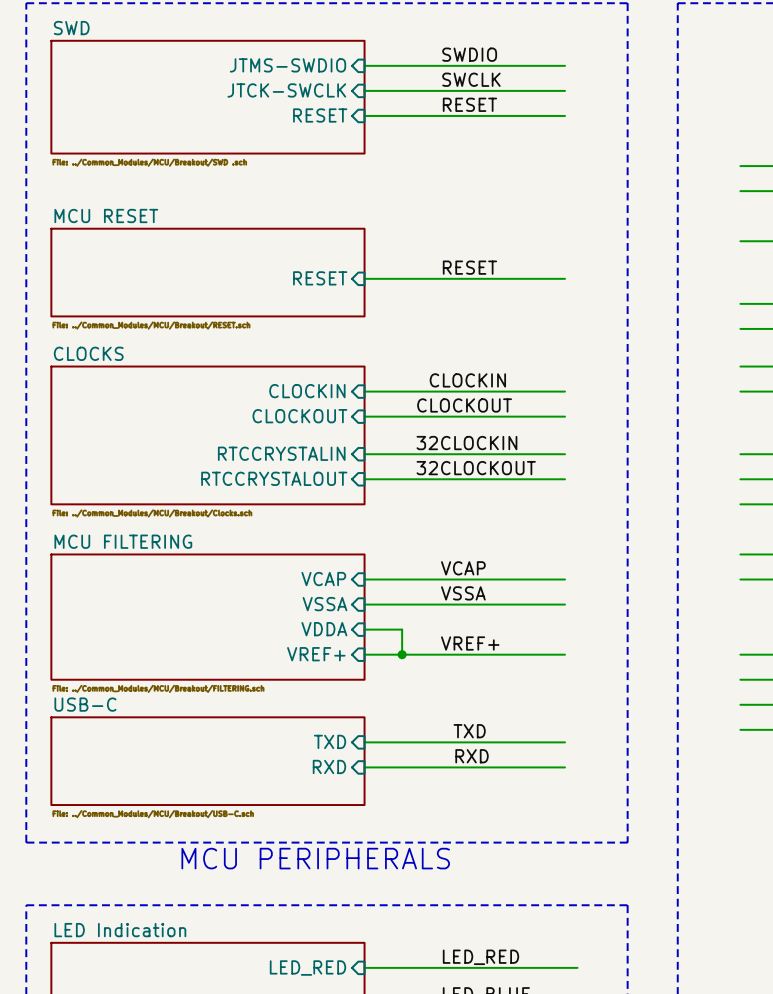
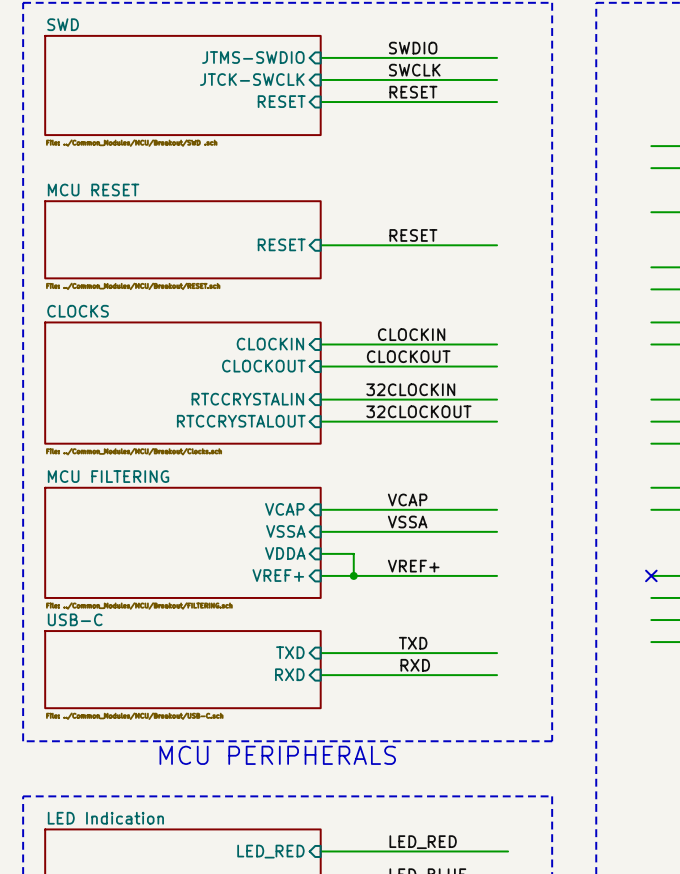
no-connect mark: none -> (651, 575)

